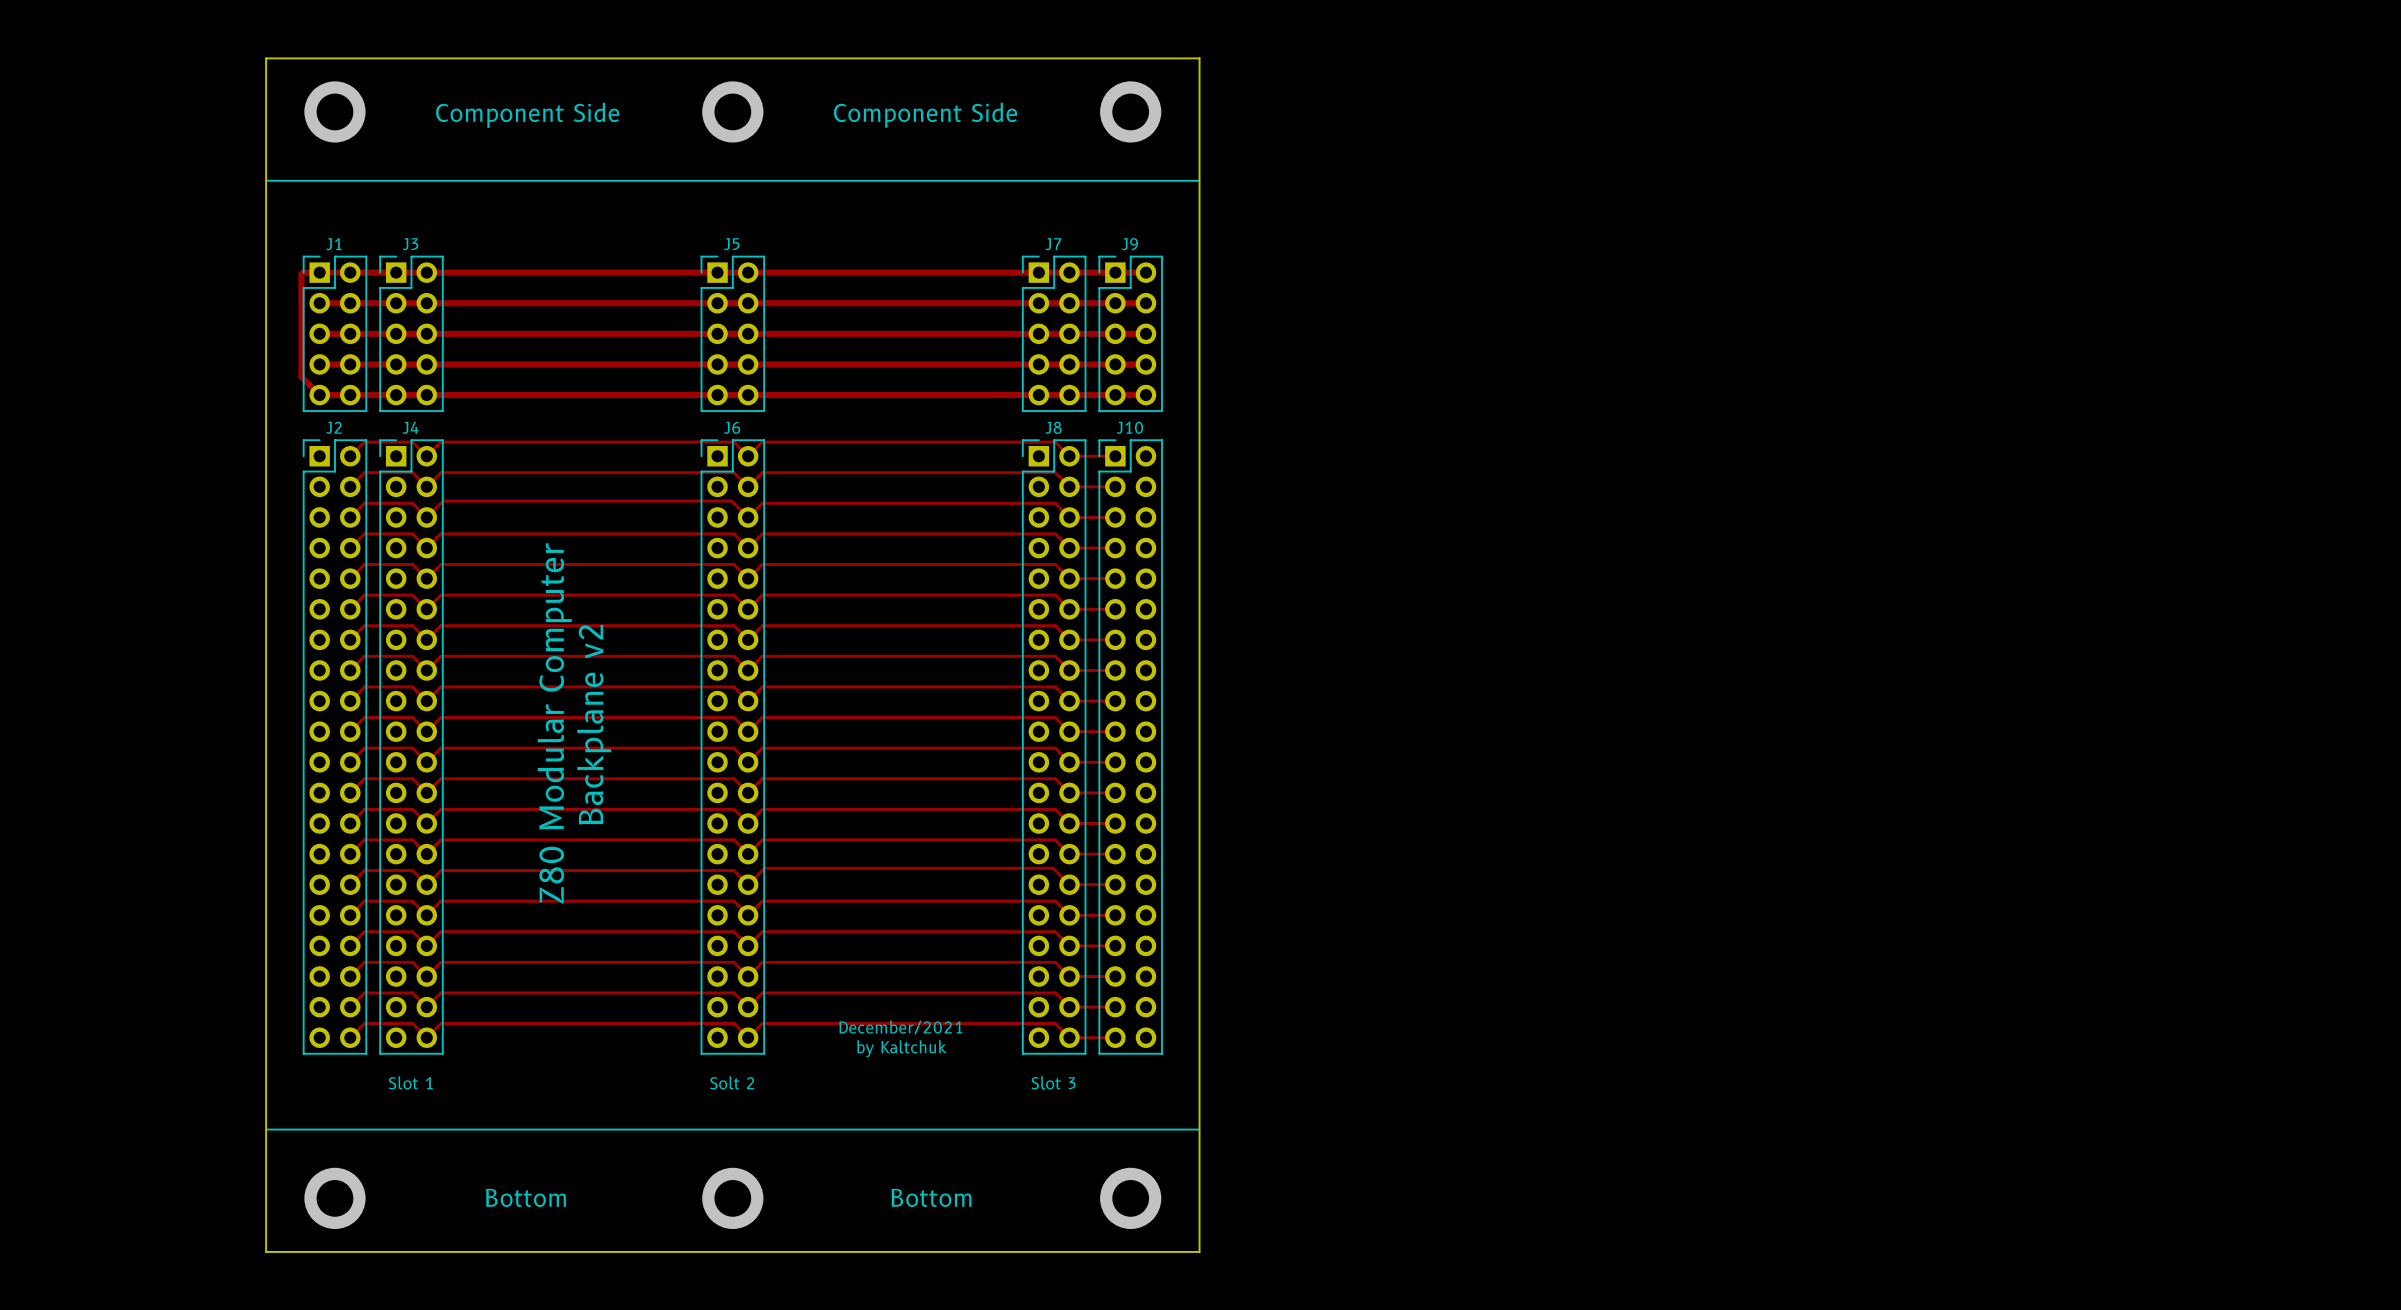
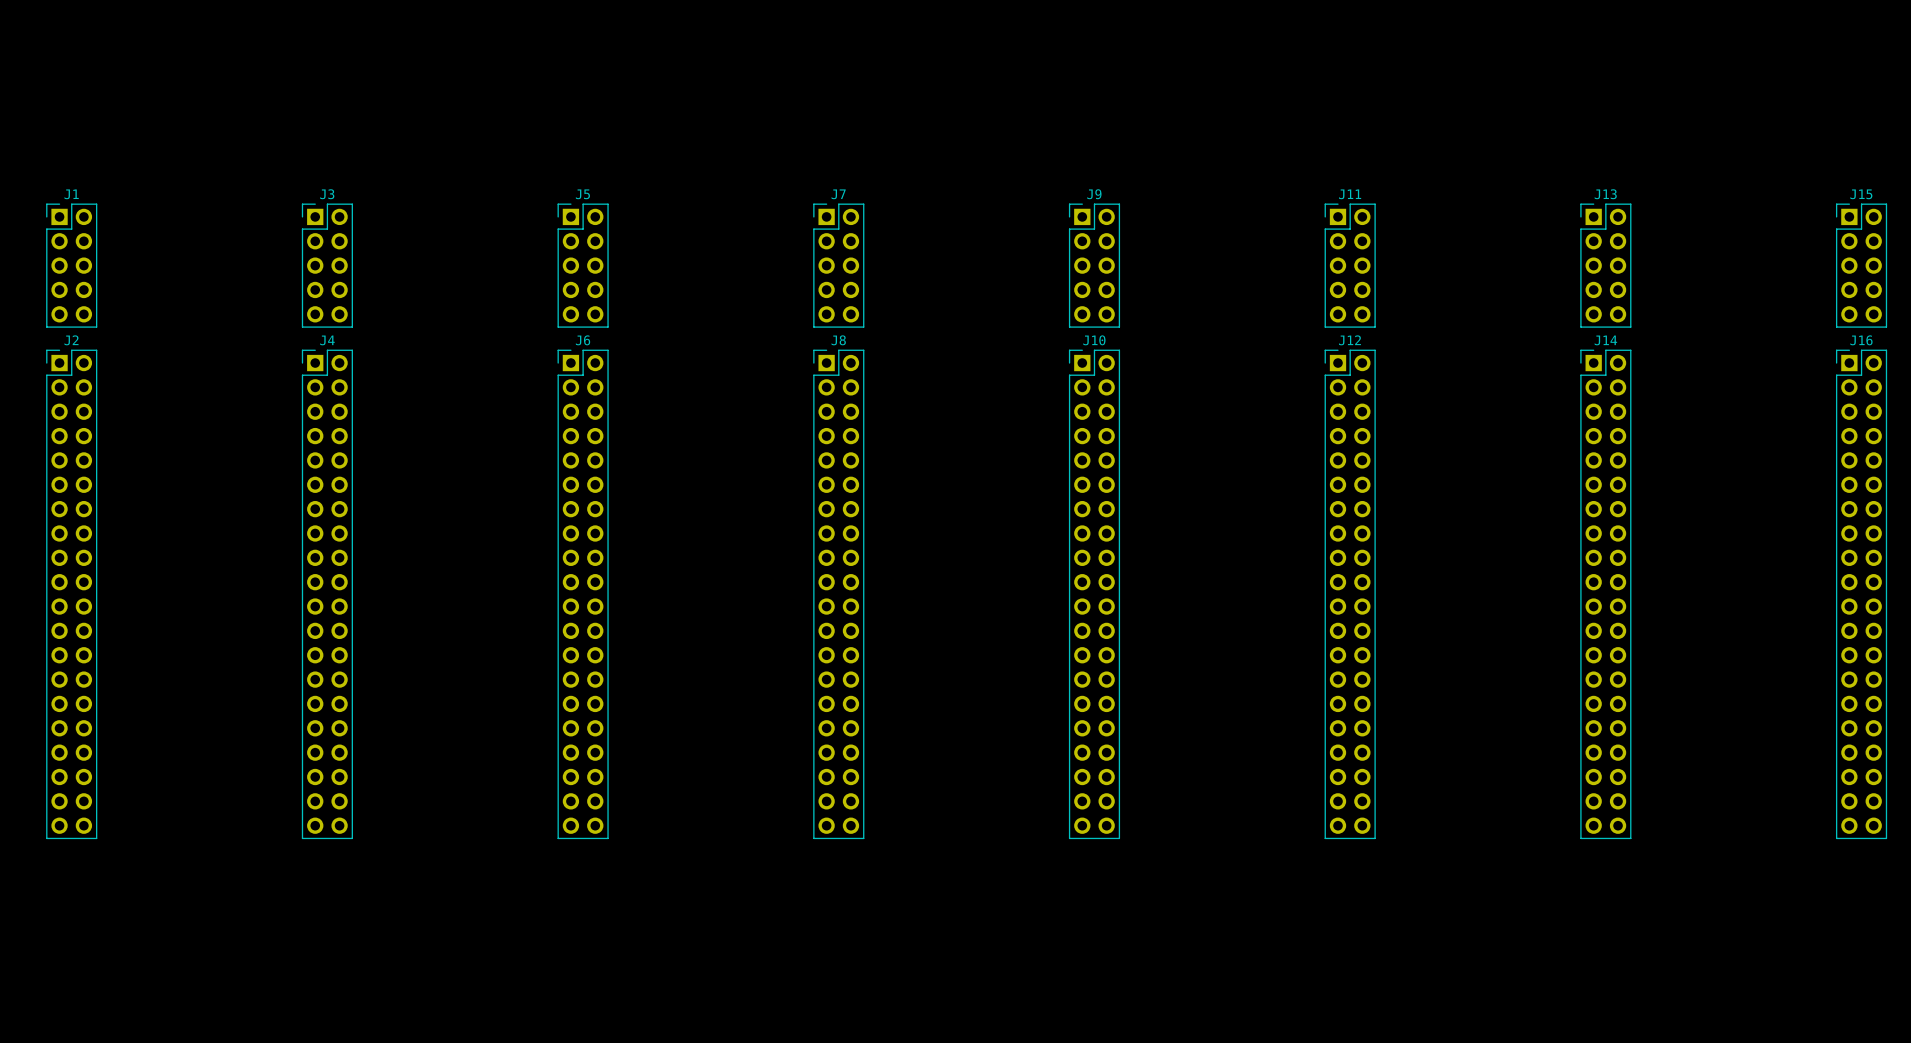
board edge: (266, 58) (266, 1251) (1199, 1251) (1199, 58) (266, 58) -> none
via: (334, 111) -> none
via: (732, 111) -> none
via: (1130, 111) -> none
text: Component Side (527, 115) -> none
text: Component Side (925, 115) -> none
line: (266, 180) (1199, 180) -> none
track: (1145, 272) (303, 272) (301, 274) (301, 376) (319, 395) (1145, 395) -> none
track: (319, 303) (1145, 303) -> none
track: (319, 333) (1145, 333) -> none
J1 position: (334, 333) -> (71, 265)
J9 position: (1130, 333) -> (1094, 265)
J11: none -> (1350, 265)
J13: none -> (1605, 265)
J15: none -> (1861, 265)
track: (319, 364) (1145, 364) -> none
track: (350, 456) (364, 442) (412, 442) (426, 456) (440, 442) (733, 442) (748, 456) (762, 442) (1055, 442) (1069, 456) (1115, 456) -> none
track: (350, 486) (364, 472) (412, 472) (426, 486) (440, 472) (733, 472) (748, 486) (762, 472) (1055, 472) (1069, 486) (1115, 486) -> none
track: (350, 517) (364, 503) (412, 503) (426, 517) (443, 501) (731, 501) (748, 517) (762, 503) (1055, 503) (1069, 517) (1115, 517) -> none
track: (350, 548) (364, 533) (412, 533) (426, 548) (440, 533) (733, 533) (748, 548) (762, 533) (1055, 533) (1069, 548) (1115, 548) -> none
track: (350, 578) (364, 564) (412, 564) (426, 578) (440, 564) (733, 564) (748, 578) (762, 564) (1055, 564) (1069, 578) (1115, 578) -> none
track: (350, 609) (364, 595) (412, 595) (426, 609) (440, 595) (733, 595) (748, 609) (762, 595) (1055, 595) (1069, 609) (1115, 609) -> none
track: (350, 639) (364, 625) (412, 625) (426, 639) (440, 625) (733, 625) (748, 639) (762, 625) (1055, 625) (1069, 639) (1115, 639) -> none
track: (350, 670) (364, 656) (412, 656) (426, 670) (440, 656) (733, 656) (748, 670) (762, 656) (1055, 656) (1069, 670) (1115, 670) -> none
track: (350, 701) (364, 686) (412, 686) (426, 701) (440, 686) (733, 686) (748, 701) (762, 686) (1055, 686) (1069, 701) (1115, 701) -> none
text: Z80 Modular Computer (554, 723) -> none
text: Backplane v2 (594, 724) -> none
track: (350, 731) (364, 717) (412, 717) (426, 731) (440, 717) (733, 717) (748, 731) (762, 717) (1055, 717) (1069, 731) (1115, 731) -> none
J2 position: (334, 746) -> (71, 594)
J10 position: (1130, 746) -> (1094, 594)
J12: none -> (1350, 594)
J14: none -> (1605, 594)
J16: none -> (1861, 594)
track: (350, 762) (364, 748) (412, 748) (426, 762) (440, 748) (733, 748) (748, 762) (762, 748) (1055, 748) (1069, 762) (1115, 762) -> none
track: (350, 792) (364, 778) (412, 778) (426, 792) (440, 778) (733, 778) (748, 792) (762, 778) (1055, 778) (1069, 792) (1115, 792) -> none
track: (350, 823) (364, 809) (412, 809) (426, 823) (440, 809) (733, 809) (748, 823) (762, 809) (1055, 809) (1069, 823) (1115, 823) -> none
track: (350, 854) (364, 839) (412, 839) (426, 854) (440, 839) (733, 839) (748, 854) (762, 839) (1055, 839) (1069, 854) (1115, 854) -> none
track: (350, 884) (364, 870) (412, 870) (426, 884) (440, 870) (733, 870) (748, 884) (764, 868) (1053, 868) (1069, 884) (1115, 884) -> none
track: (350, 915) (364, 901) (412, 901) (426, 915) (440, 901) (733, 901) (748, 915) (762, 901) (1055, 901) (1069, 915) (1115, 915) -> none
track: (350, 945) (364, 931) (412, 931) (426, 945) (440, 931) (733, 931) (748, 945) (762, 931) (1055, 931) (1069, 945) (1115, 945) -> none
track: (350, 976) (364, 962) (412, 962) (426, 976) (440, 962) (733, 962) (748, 976) (762, 962) (1055, 962) (1069, 976) (1115, 976) -> none
track: (350, 1007) (364, 992) (412, 992) (426, 1007) (440, 992) (733, 992) (748, 1007) (762, 992) (1055, 992) (1069, 1007) (1115, 1007) -> none
text: December/2021 (900, 1027) -> none
track: (350, 1037) (364, 1023) (412, 1023) (426, 1037) (440, 1023) (733, 1023) (748, 1037) (762, 1023) (1055, 1023) (1069, 1037) (1115, 1037) -> none
text: by Kaltchuk (901, 1048) -> none
text: Slot 1 (410, 1082) -> none
text: Solt 2 (732, 1082) -> none
text: Slot 3 (1053, 1082) -> none
line: (266, 1129) (1199, 1129) -> none
text: Bottom (525, 1197) -> none
text: Bottom (931, 1197) -> none
via: (334, 1198) -> none
via: (732, 1198) -> none
via: (1130, 1198) -> none

